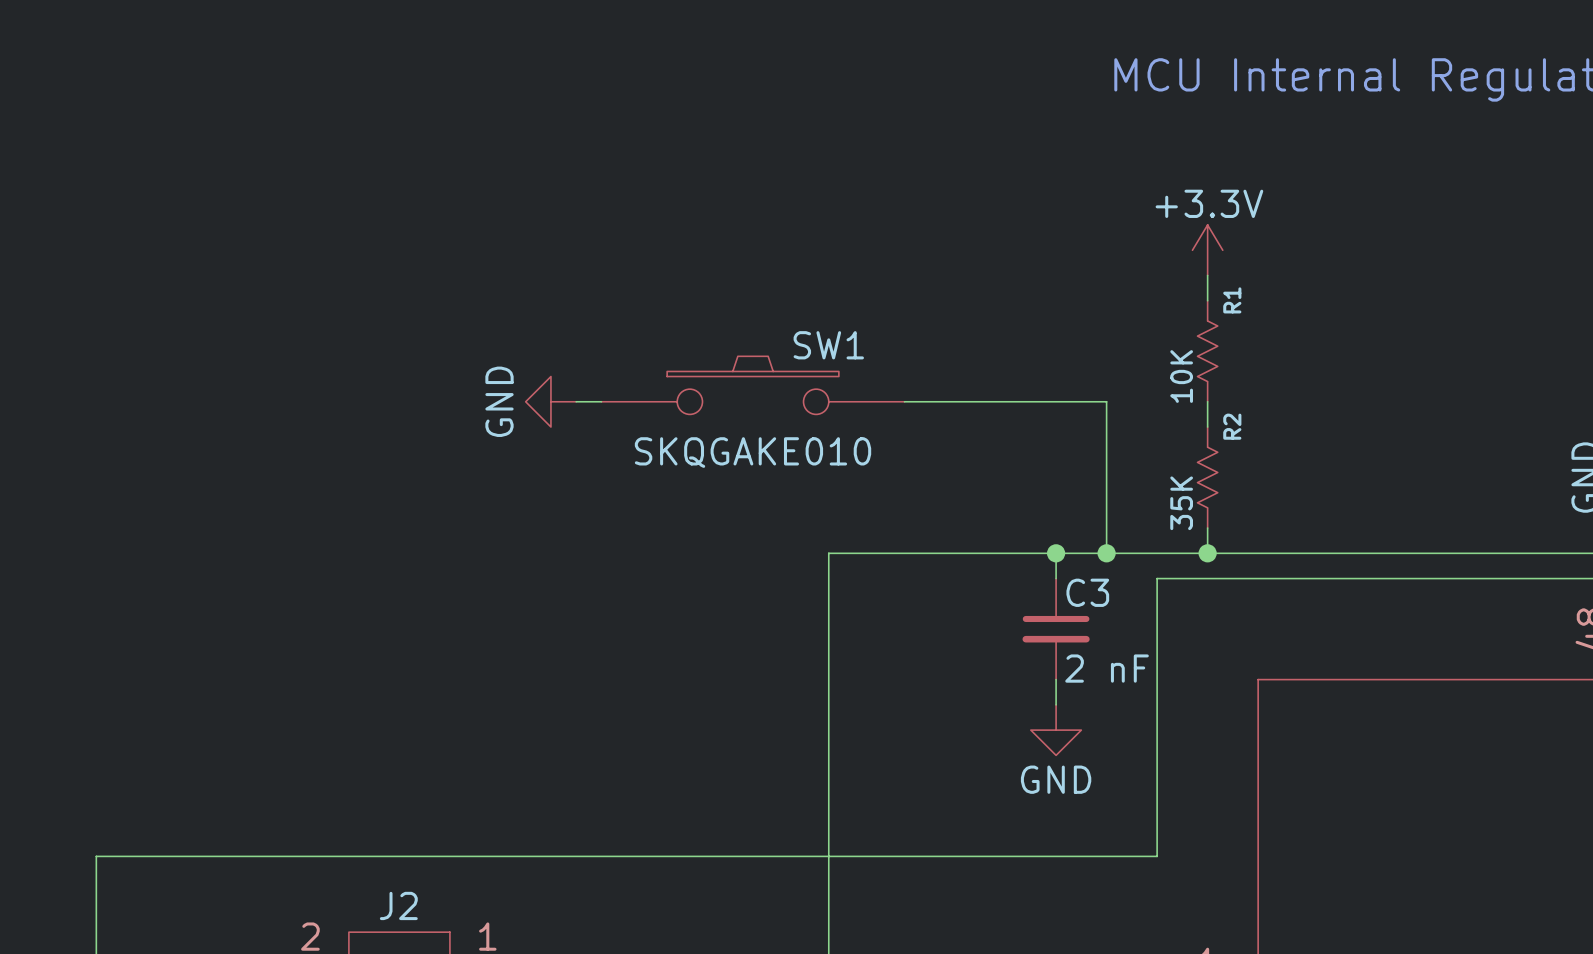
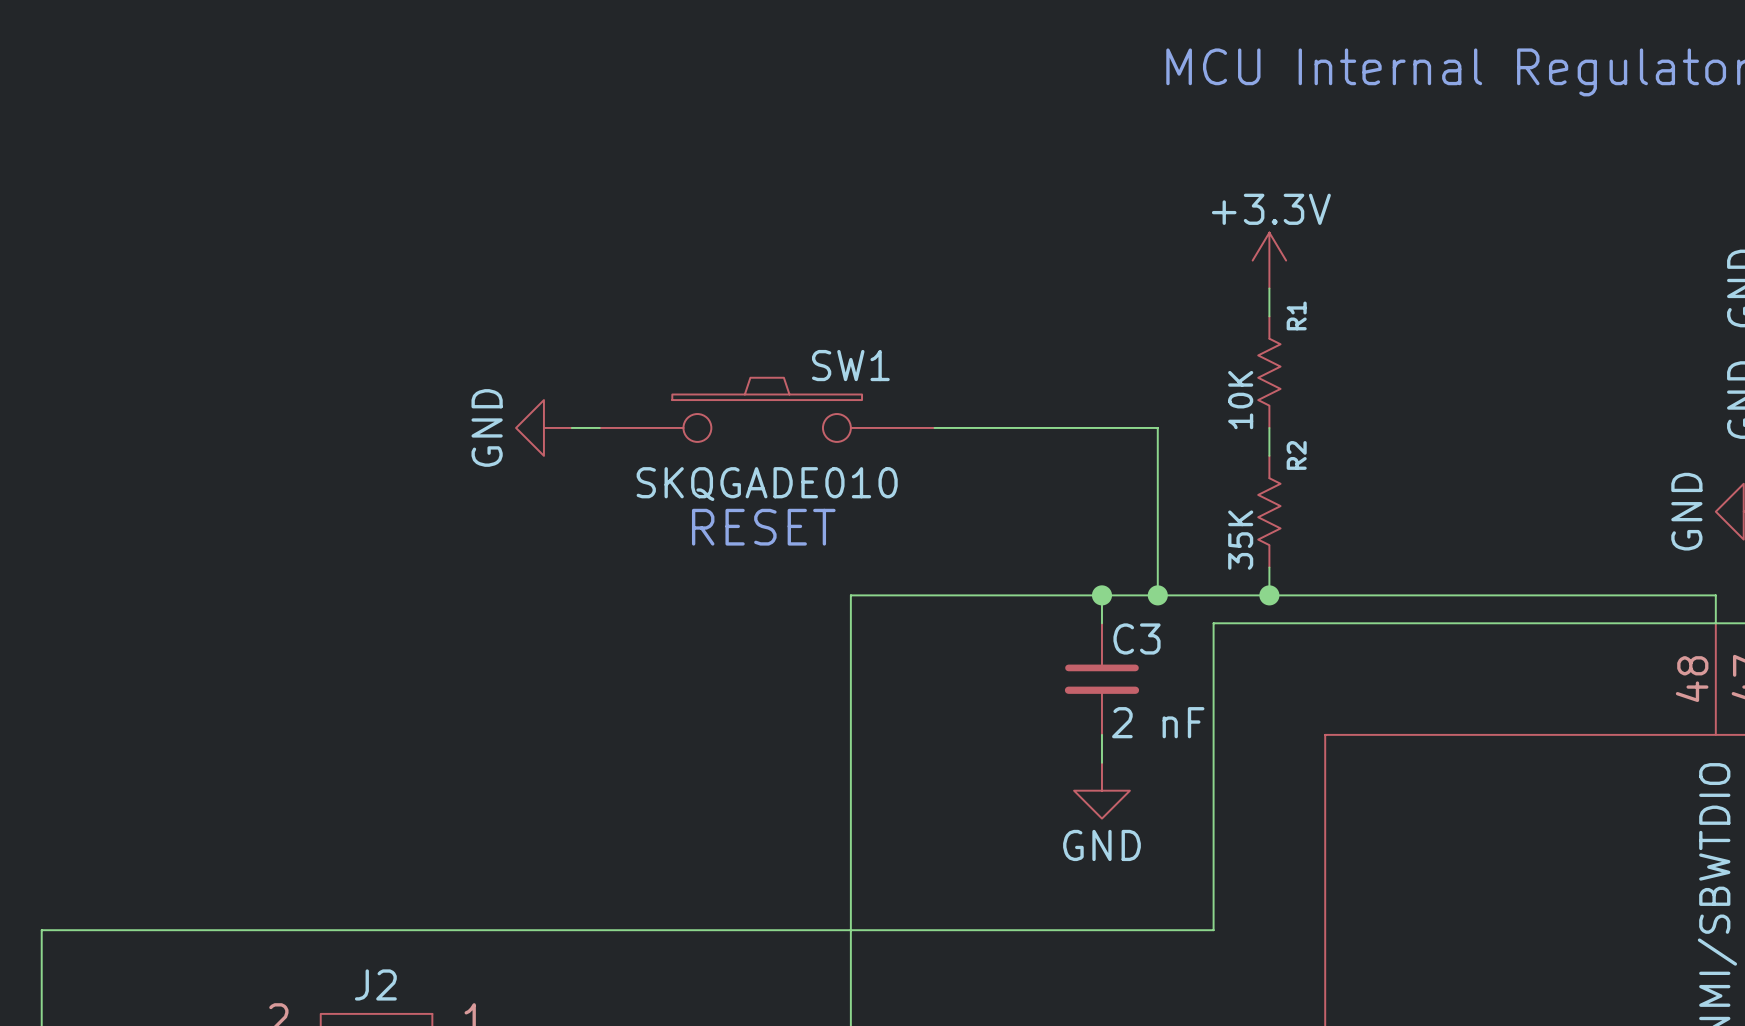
SW1 value: SKQGAKE010 (753, 452) -> SKQGADE010 (767, 484)
text: none -> RESET (763, 527)

